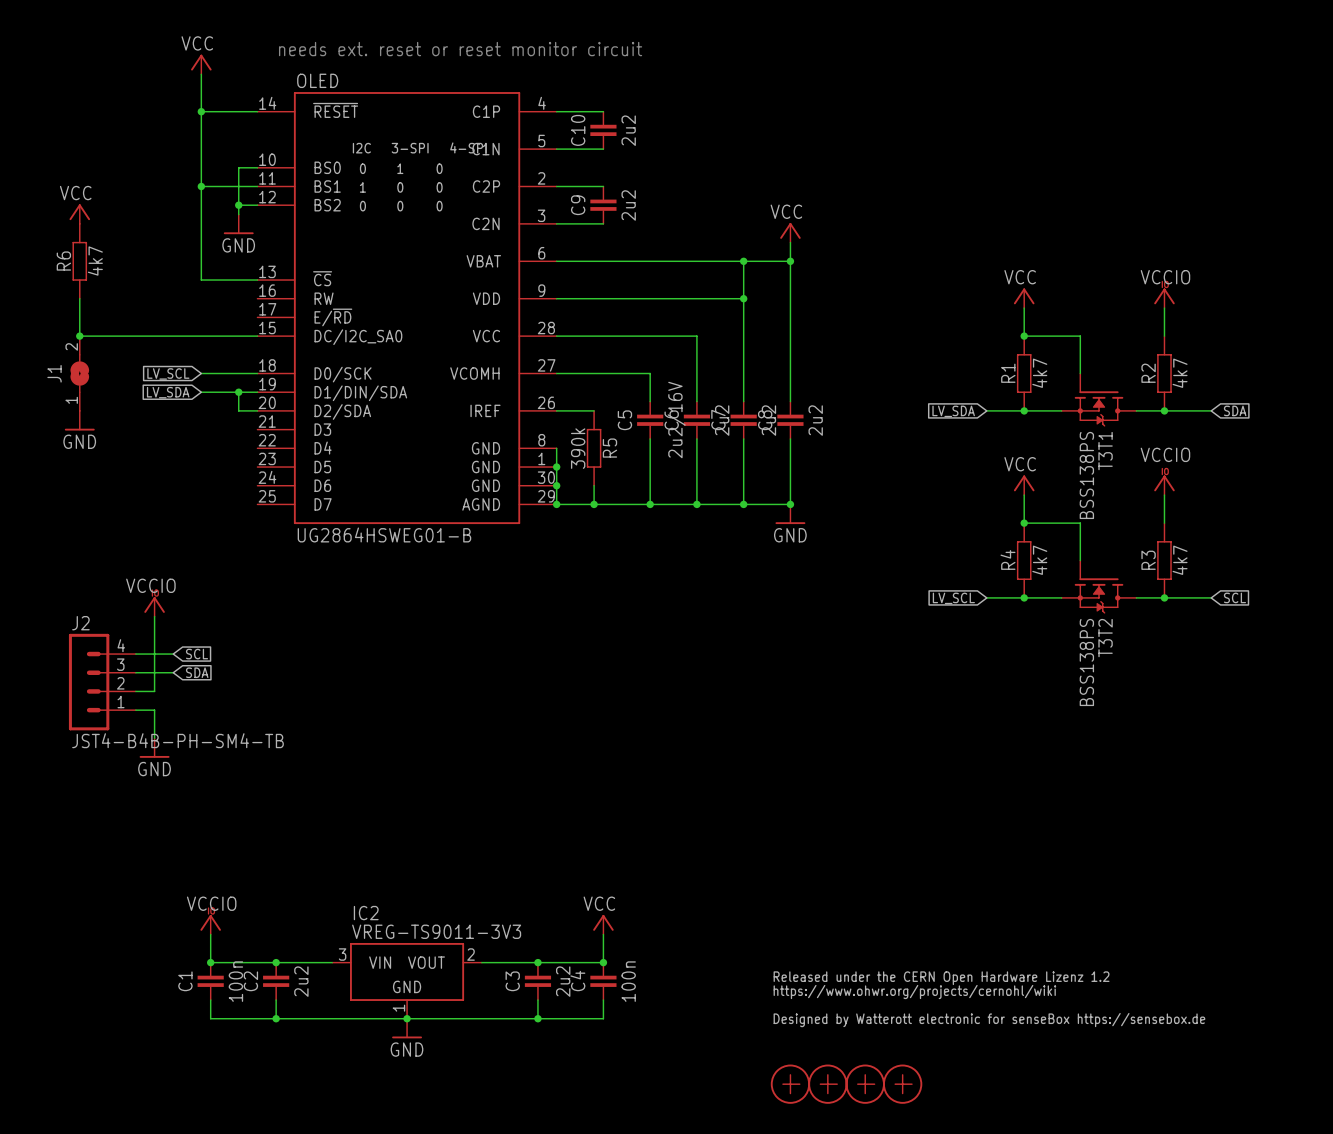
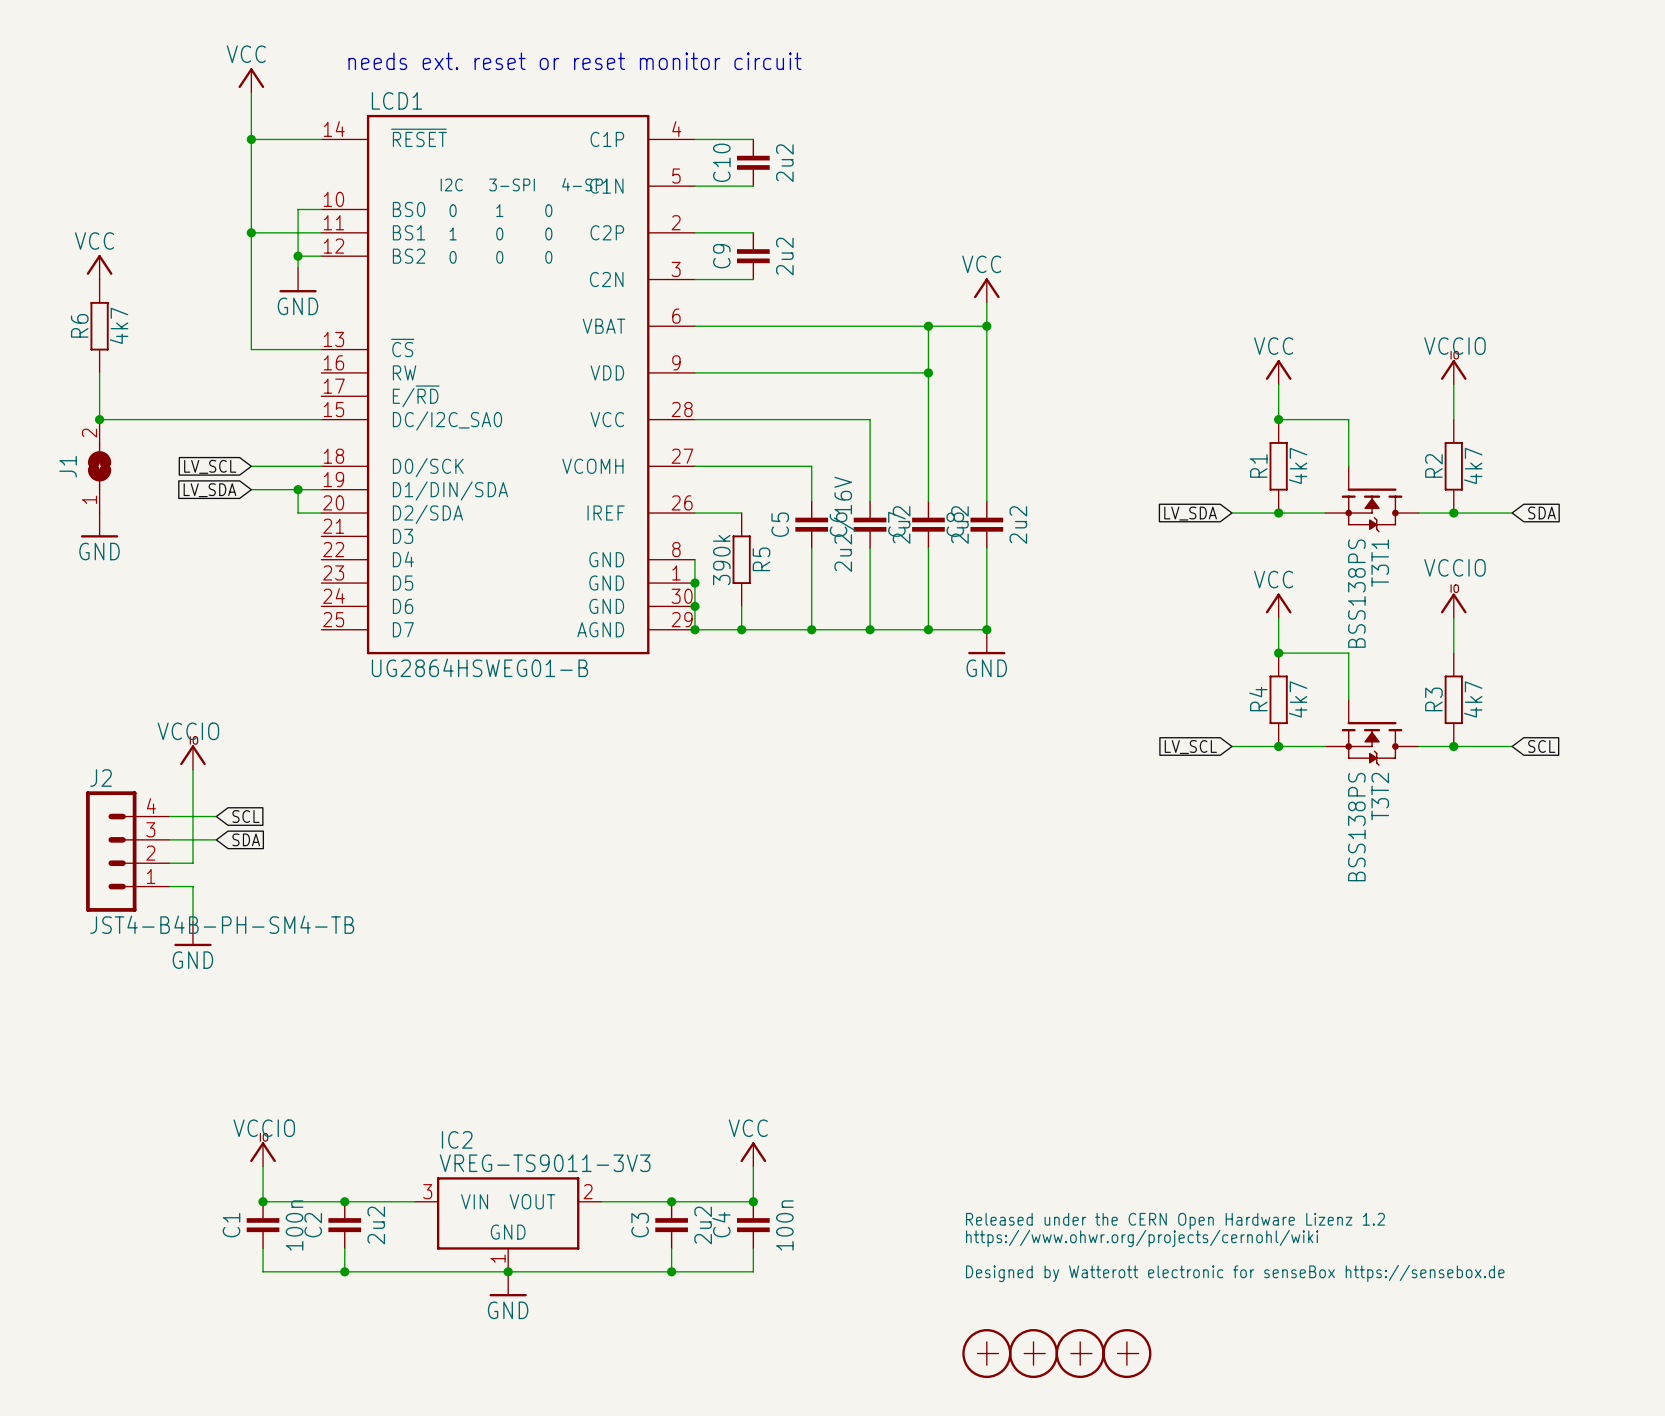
OLED name: OLED (317, 80) -> LCD1 (396, 100)

